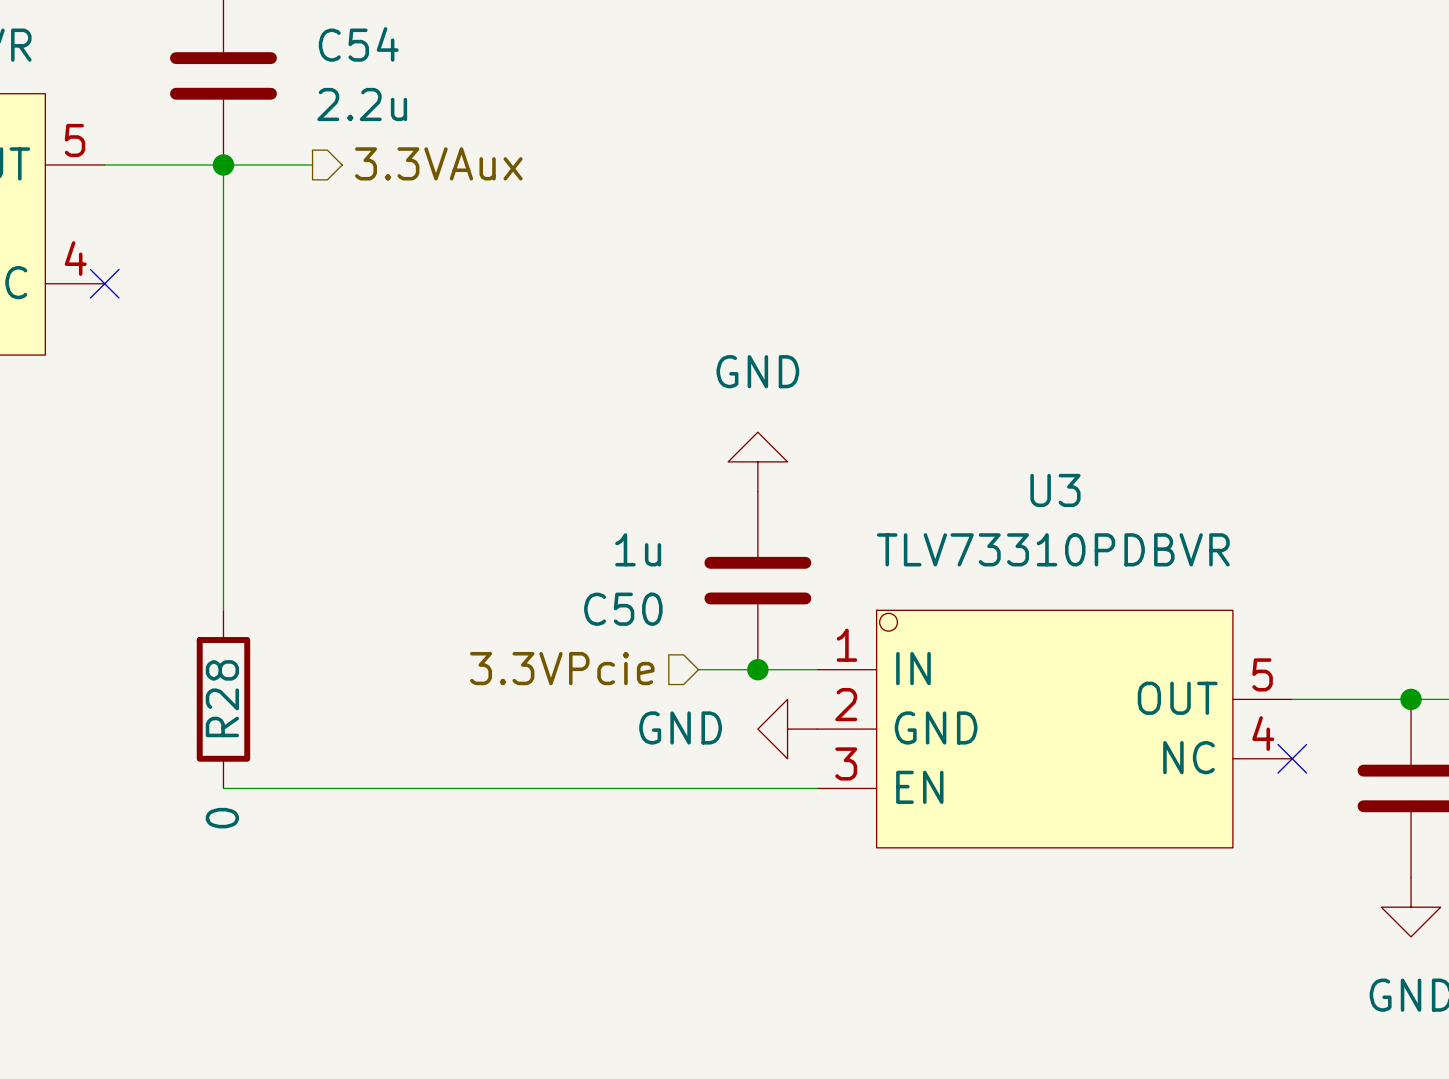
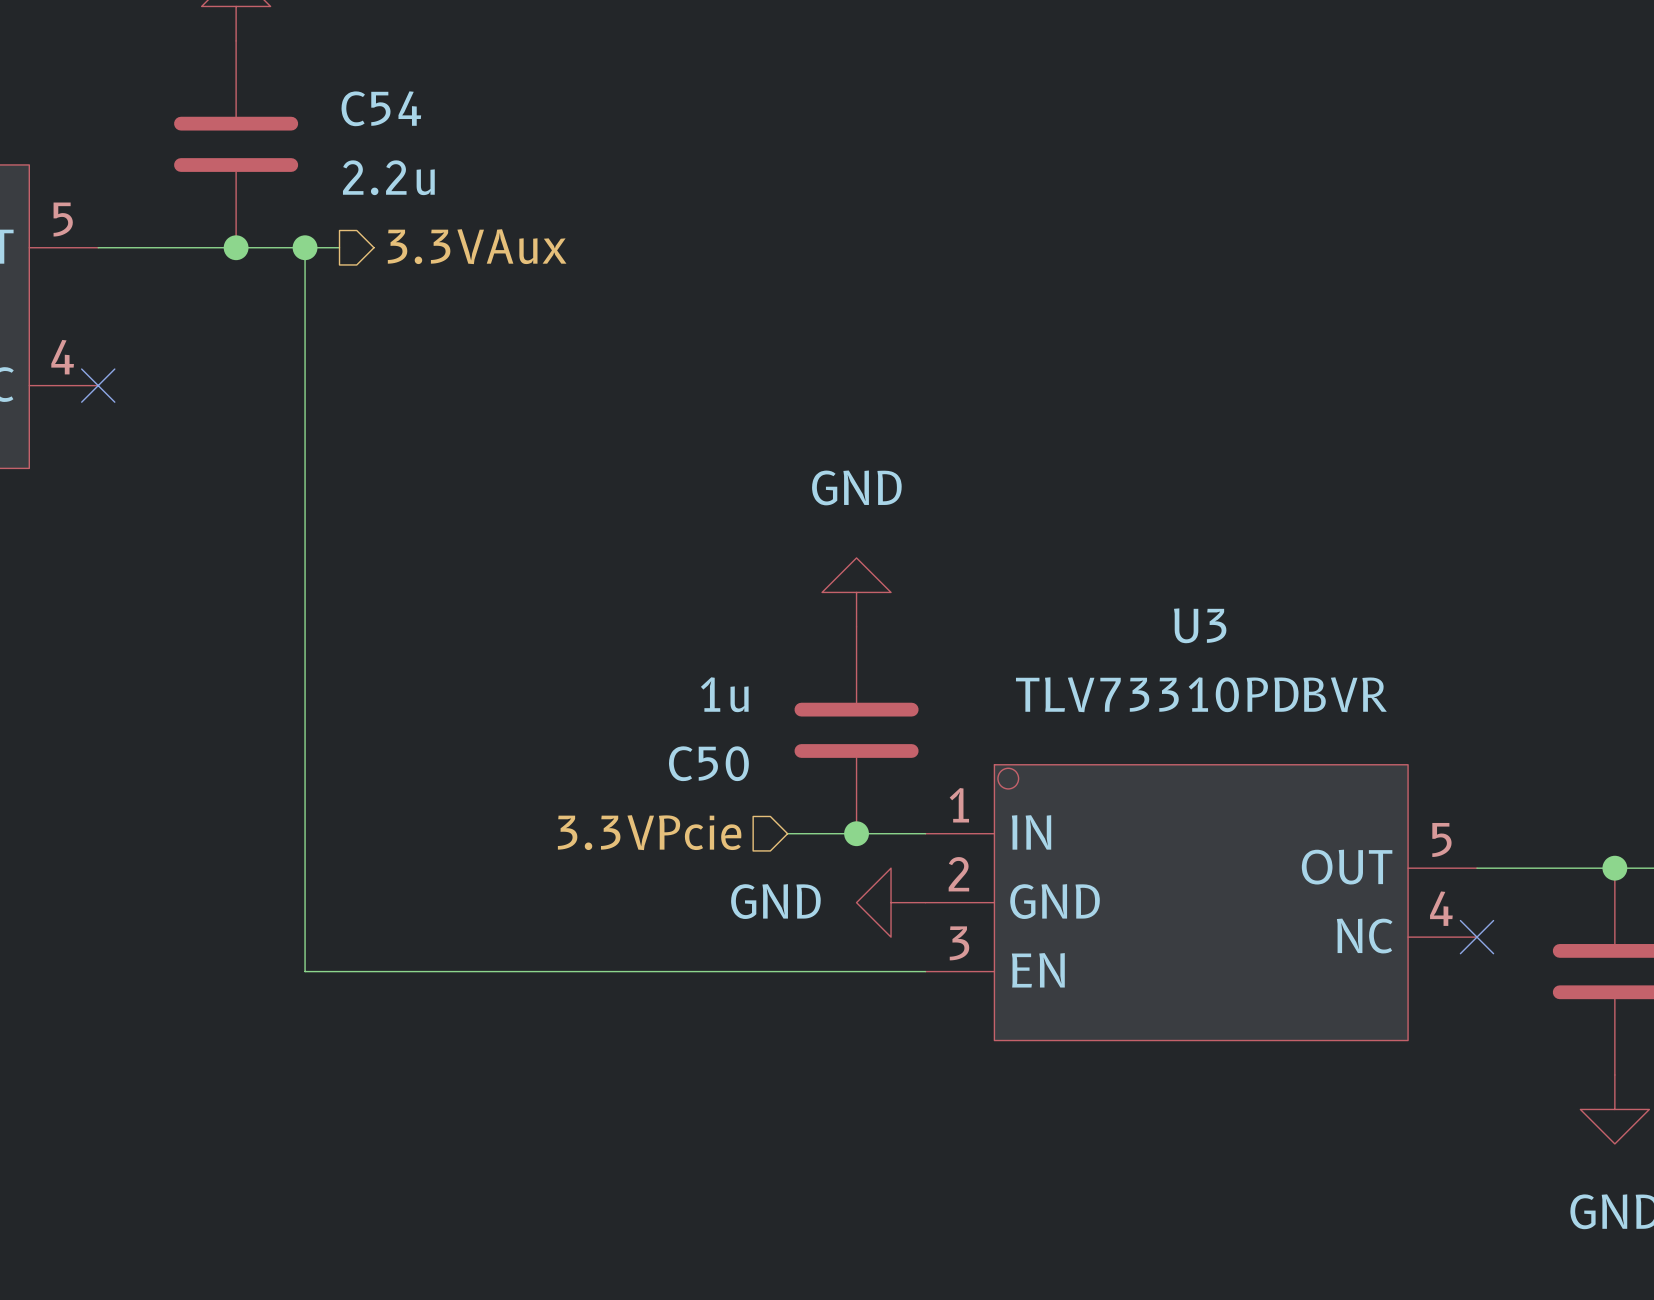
wire: (223, 164) (223, 610) -> none
junction: none -> (305, 247)
R28: 0 (223, 699) -> none
wire: (223, 788) (282, 788) -> (305, 247) (305, 971)

